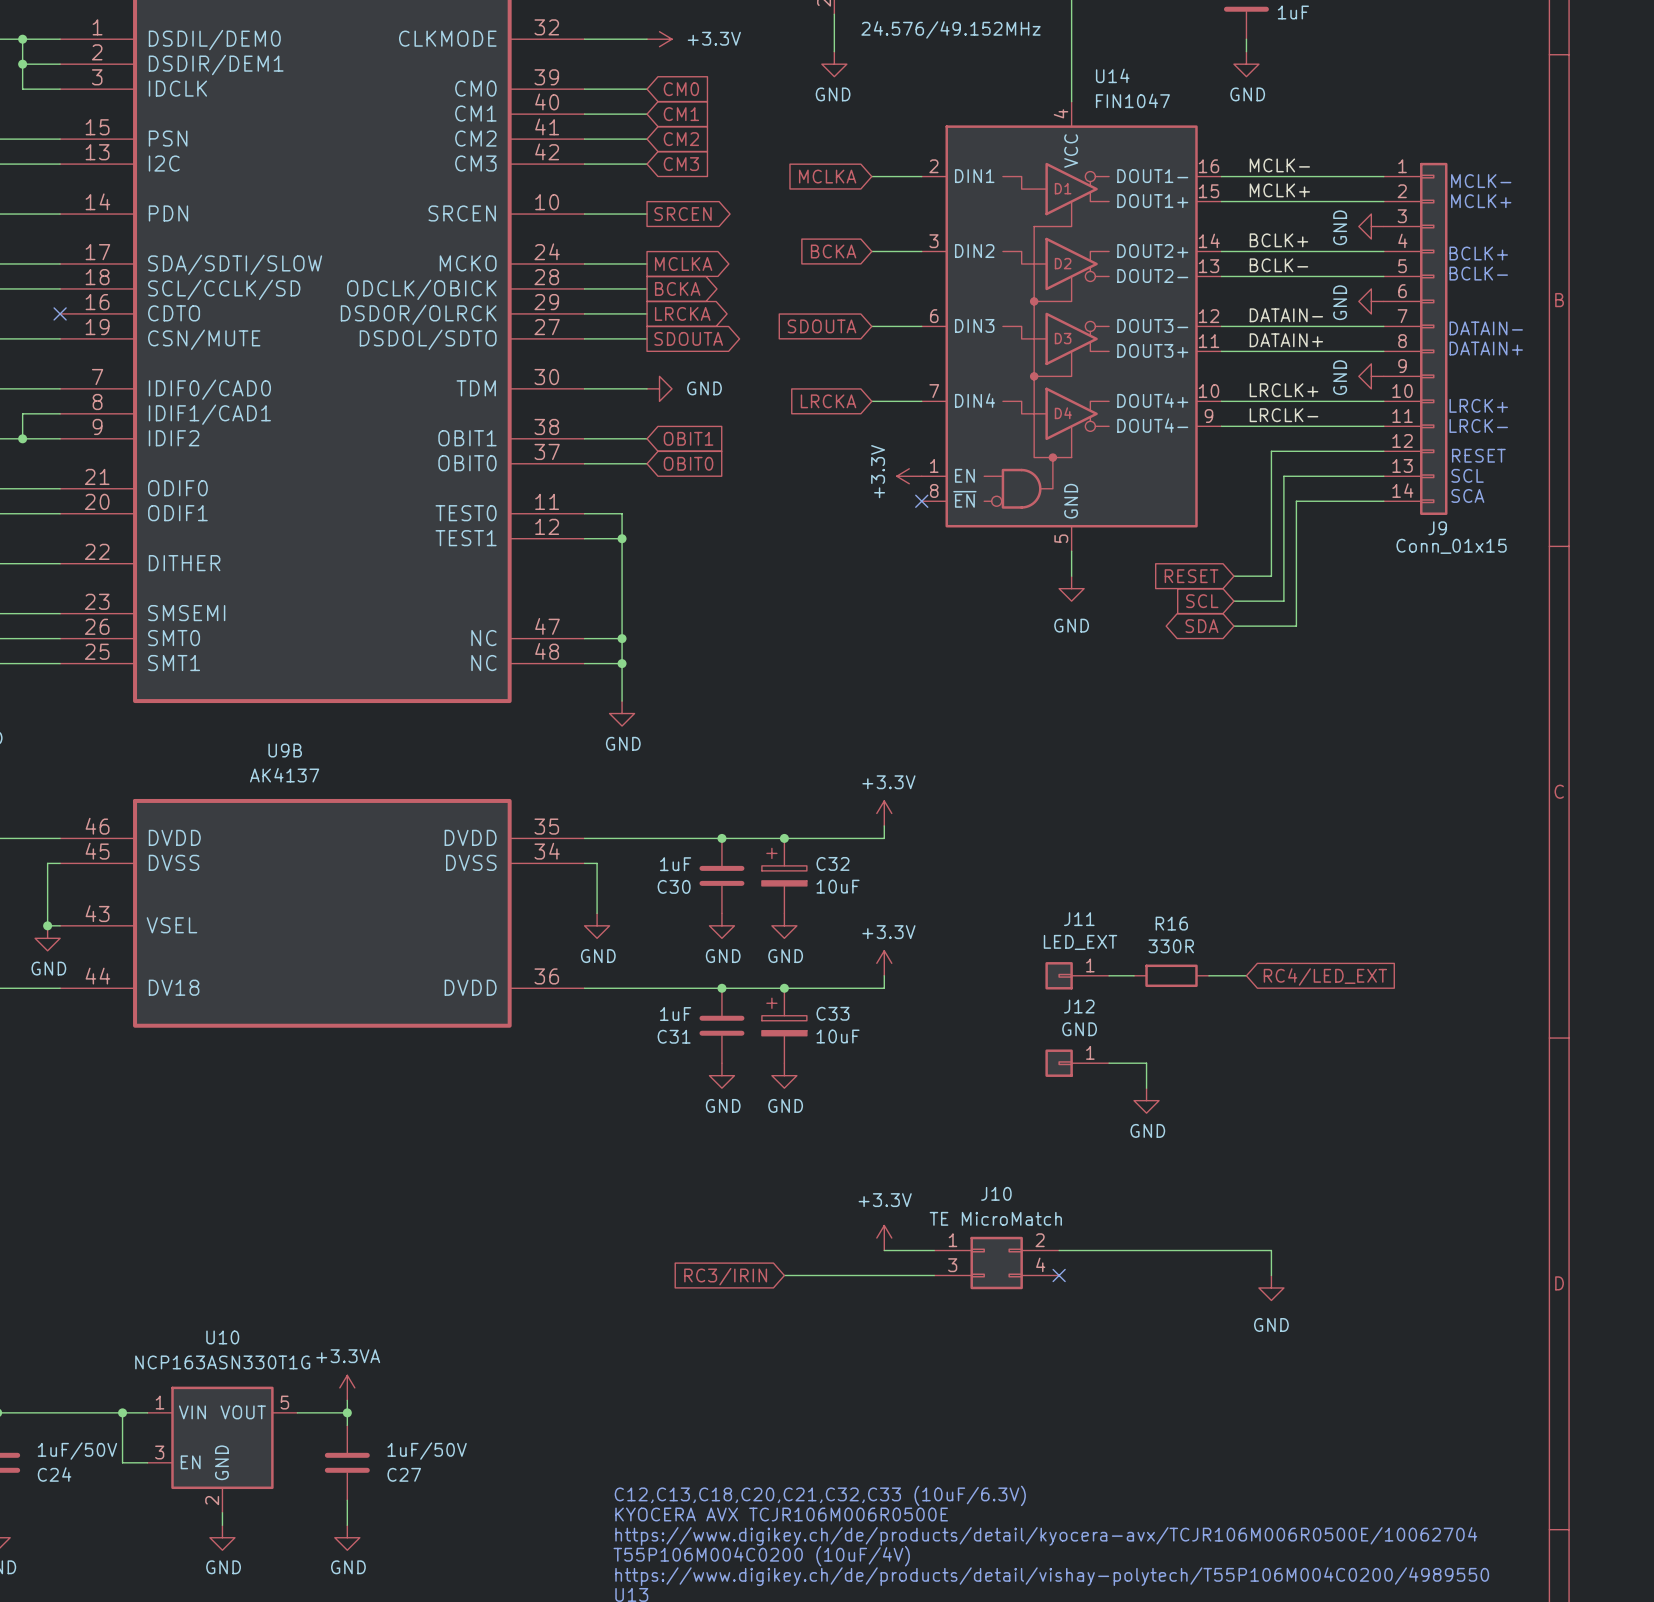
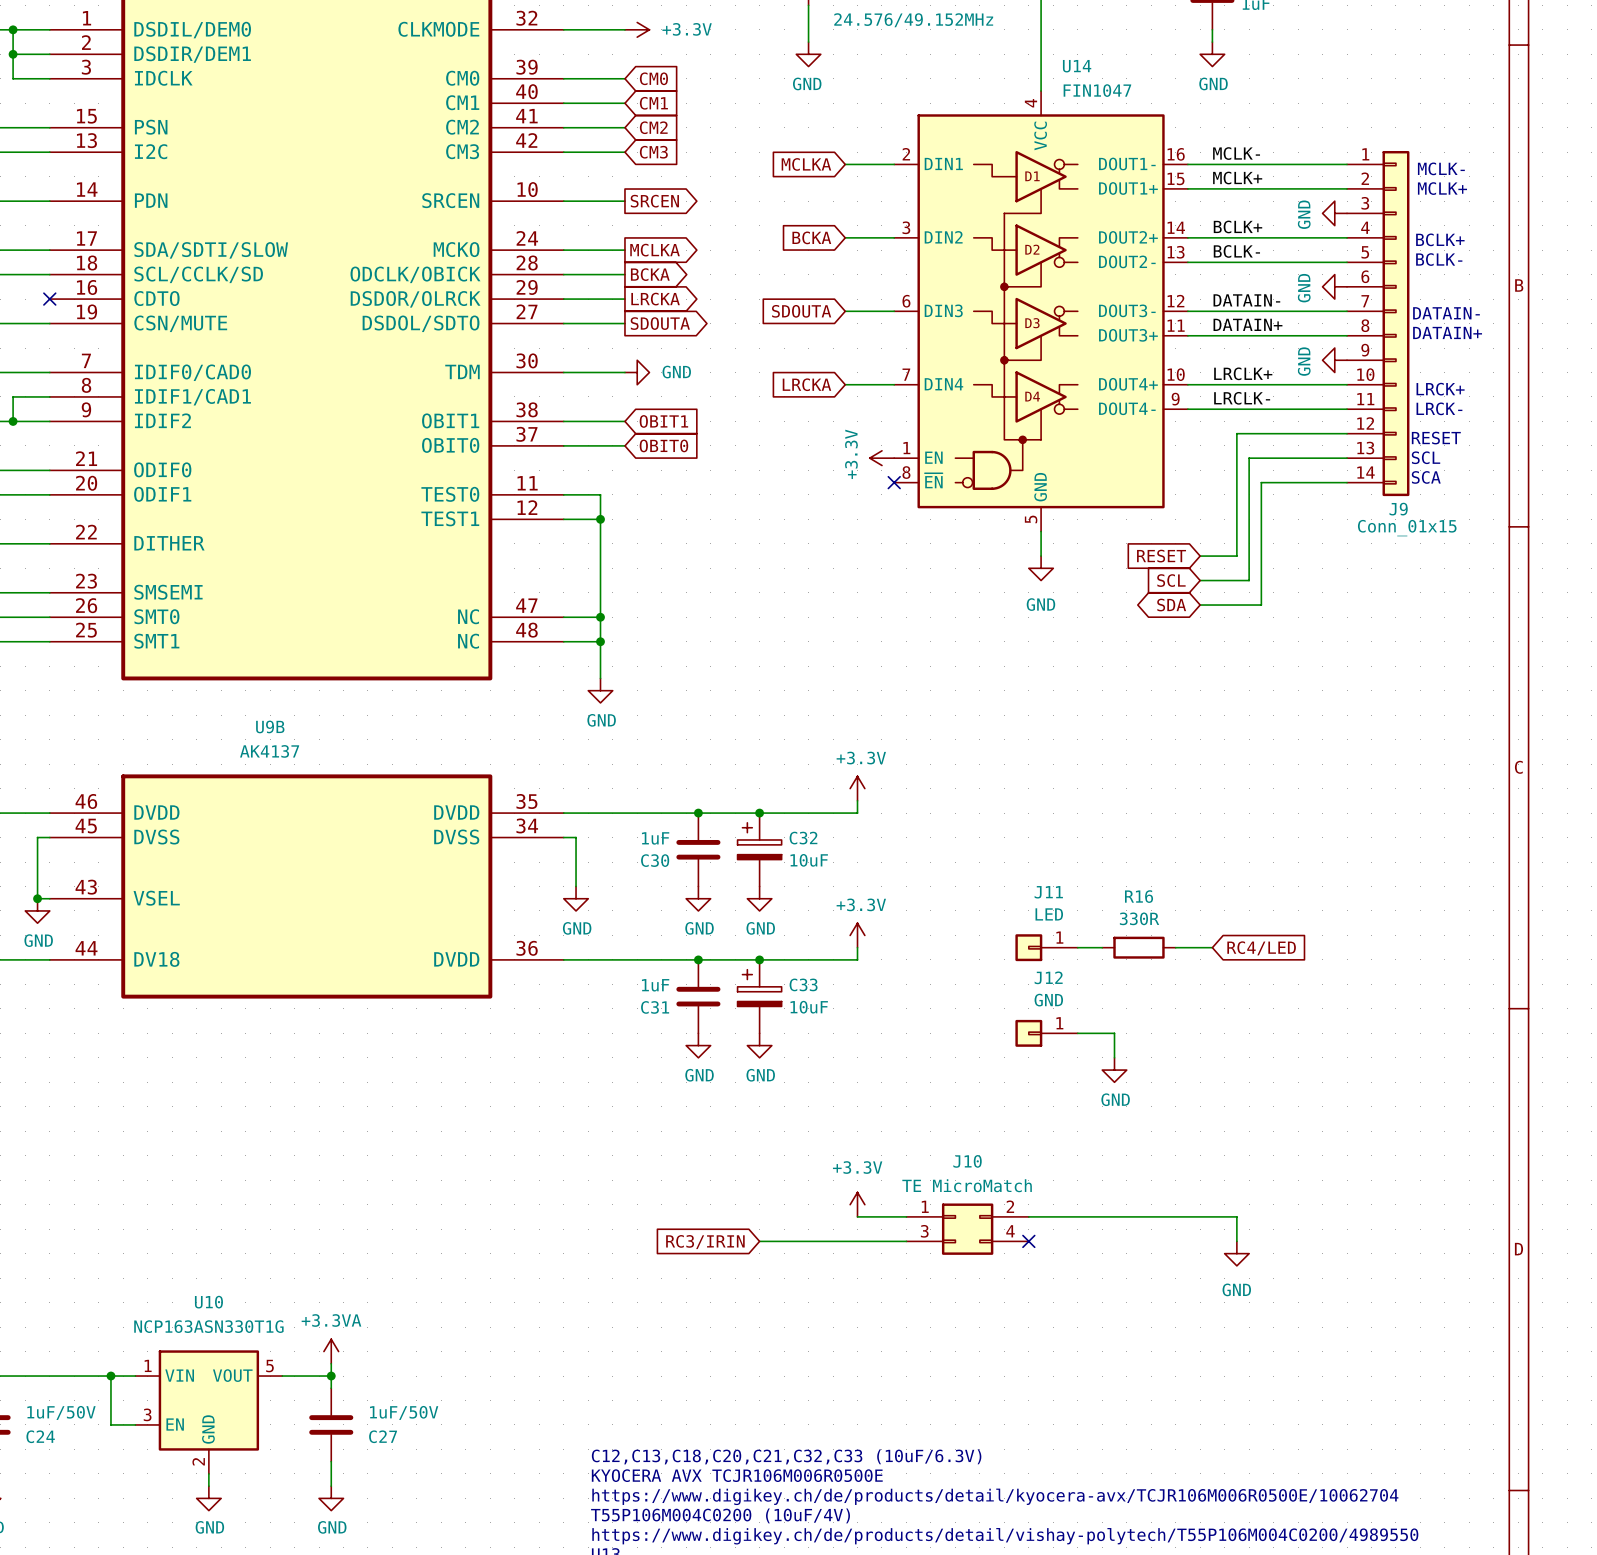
J11 value: LED_EXT (1080, 942) -> LED (1049, 914)
global label: RC4/LED_EXT (1325, 976) -> RC4/LED (1261, 948)

